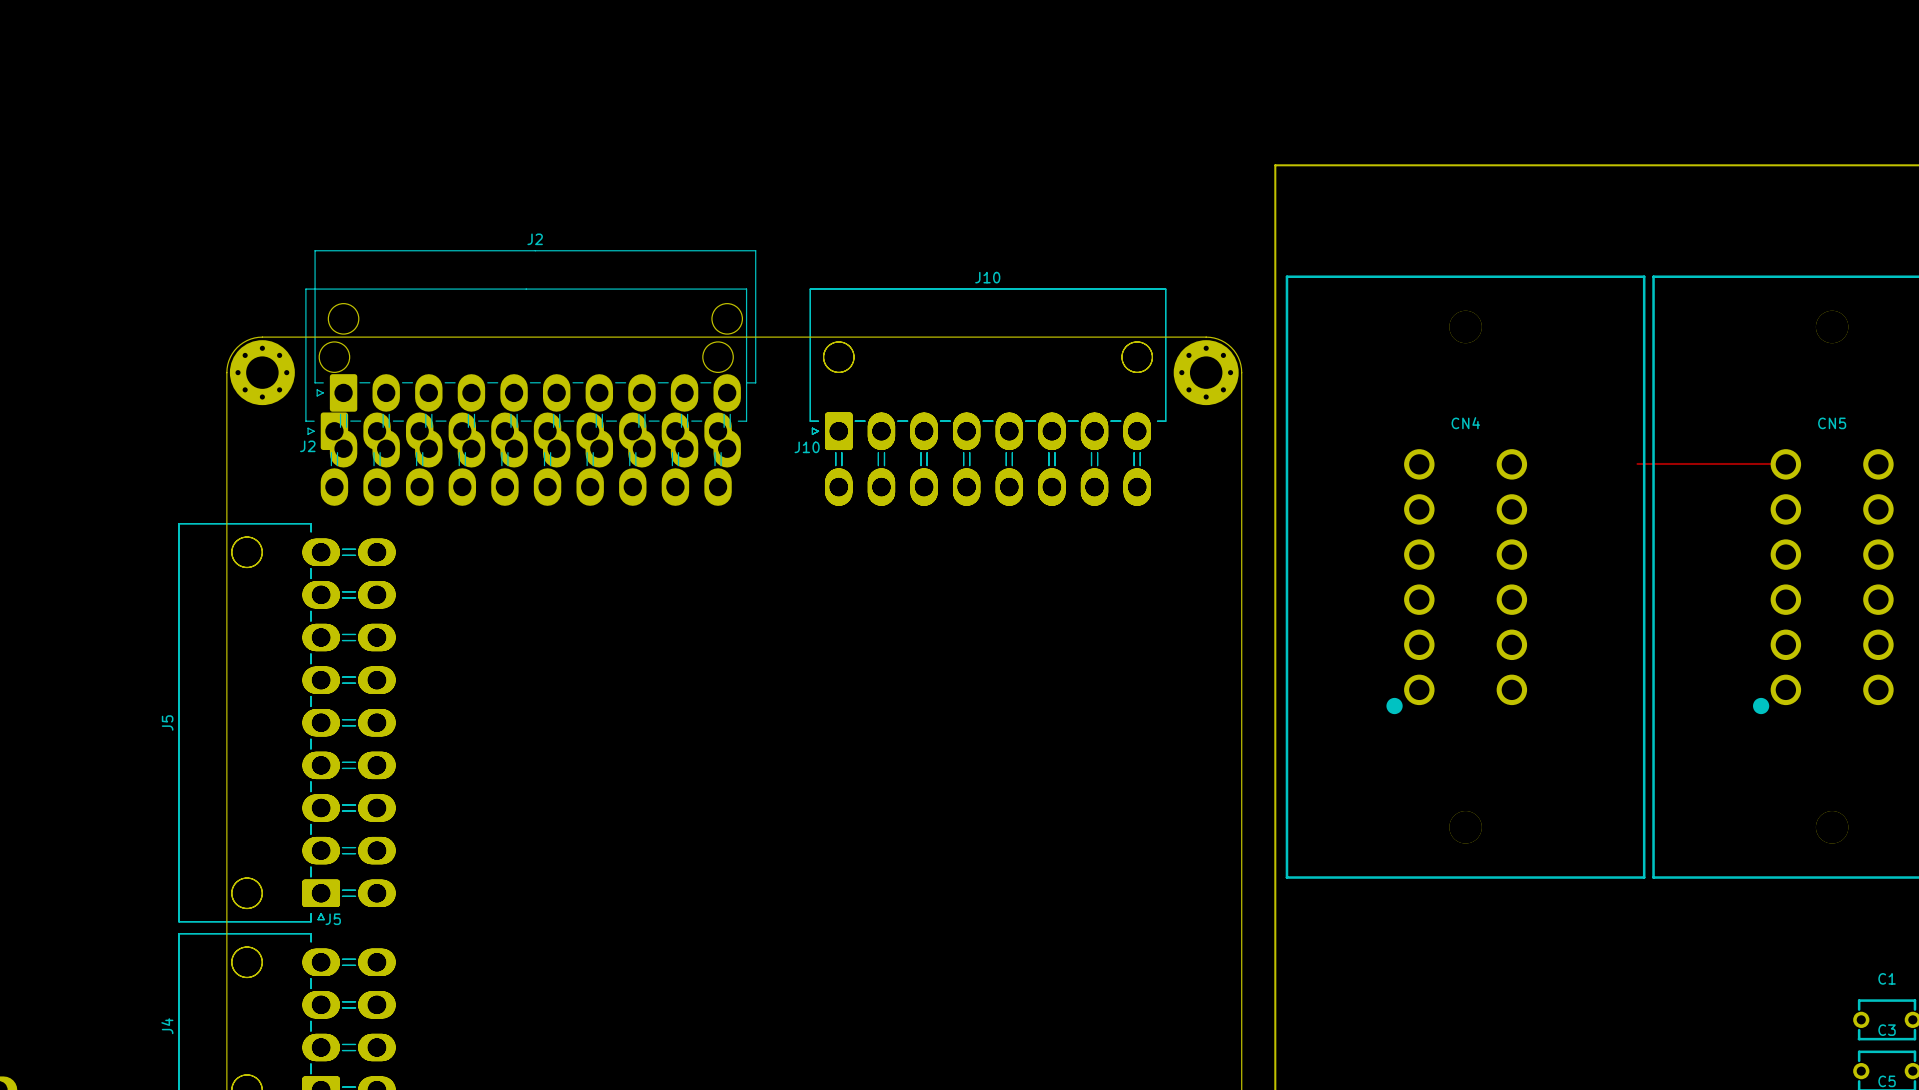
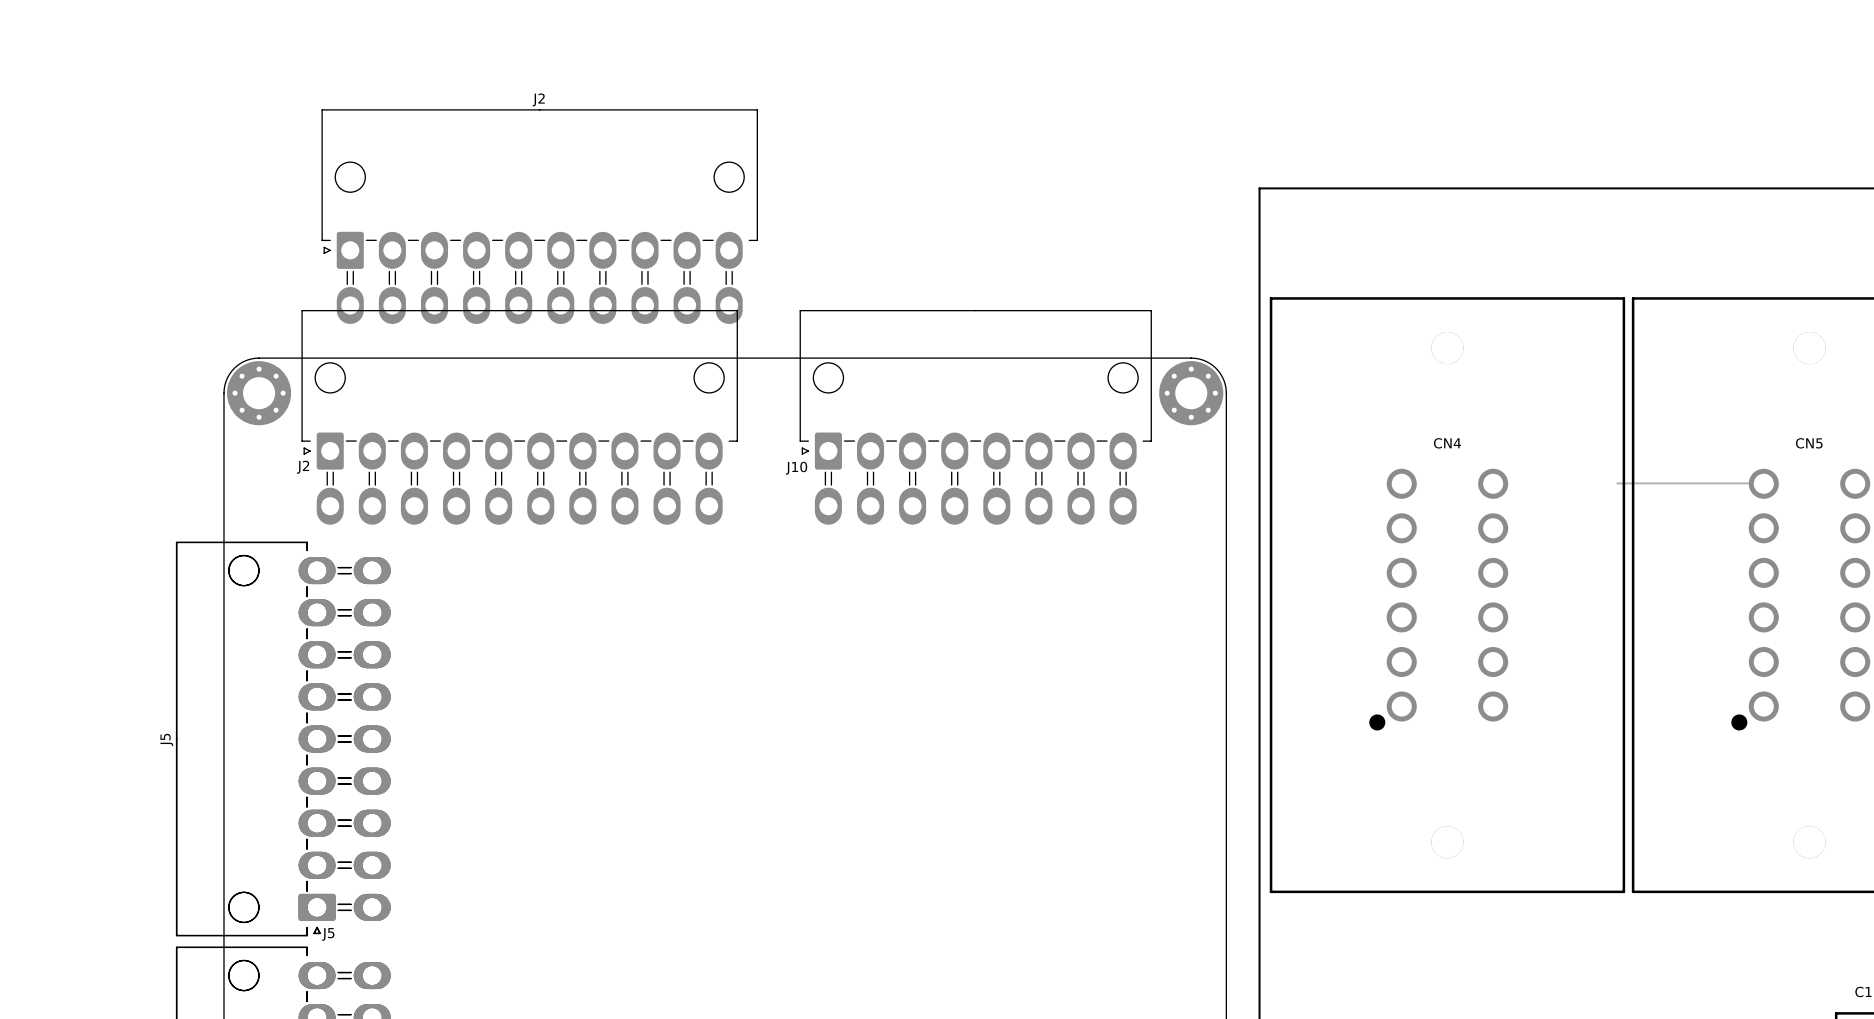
J2 position: (535, 358) -> (539, 216)
J10: (988, 397) -> none

